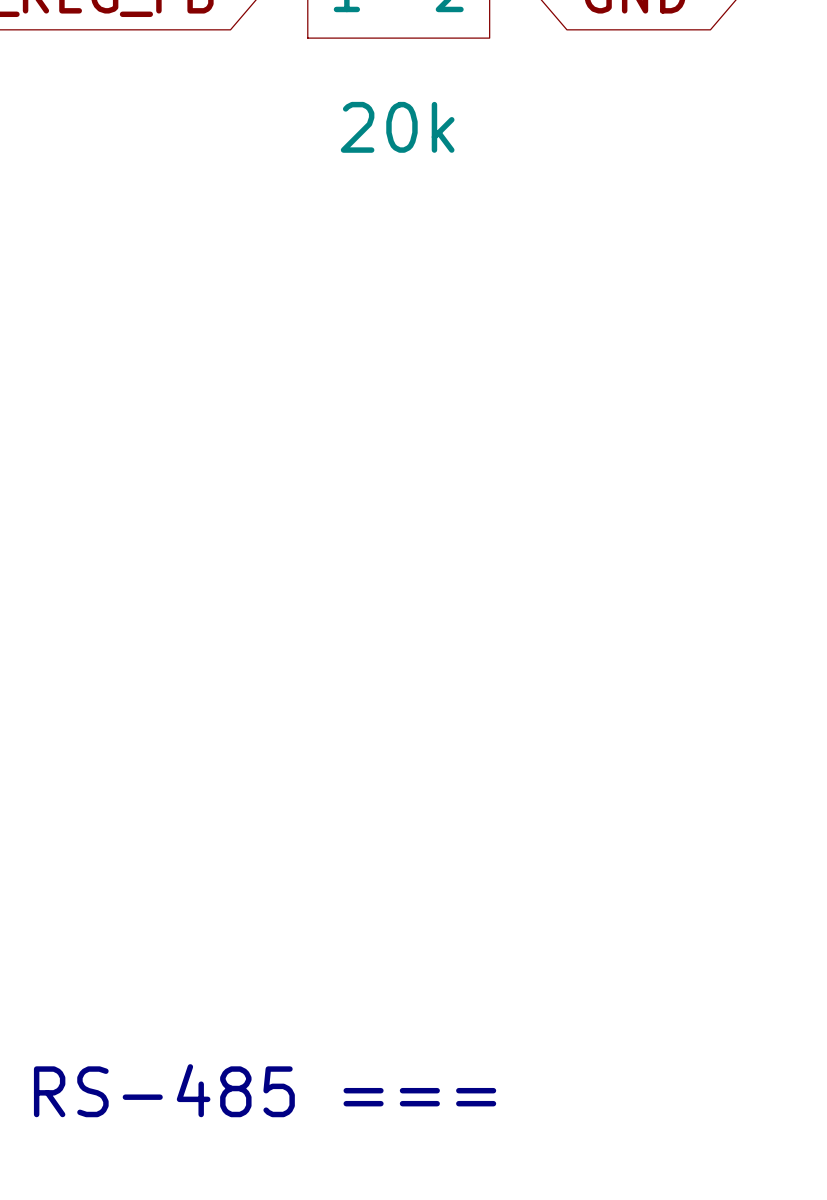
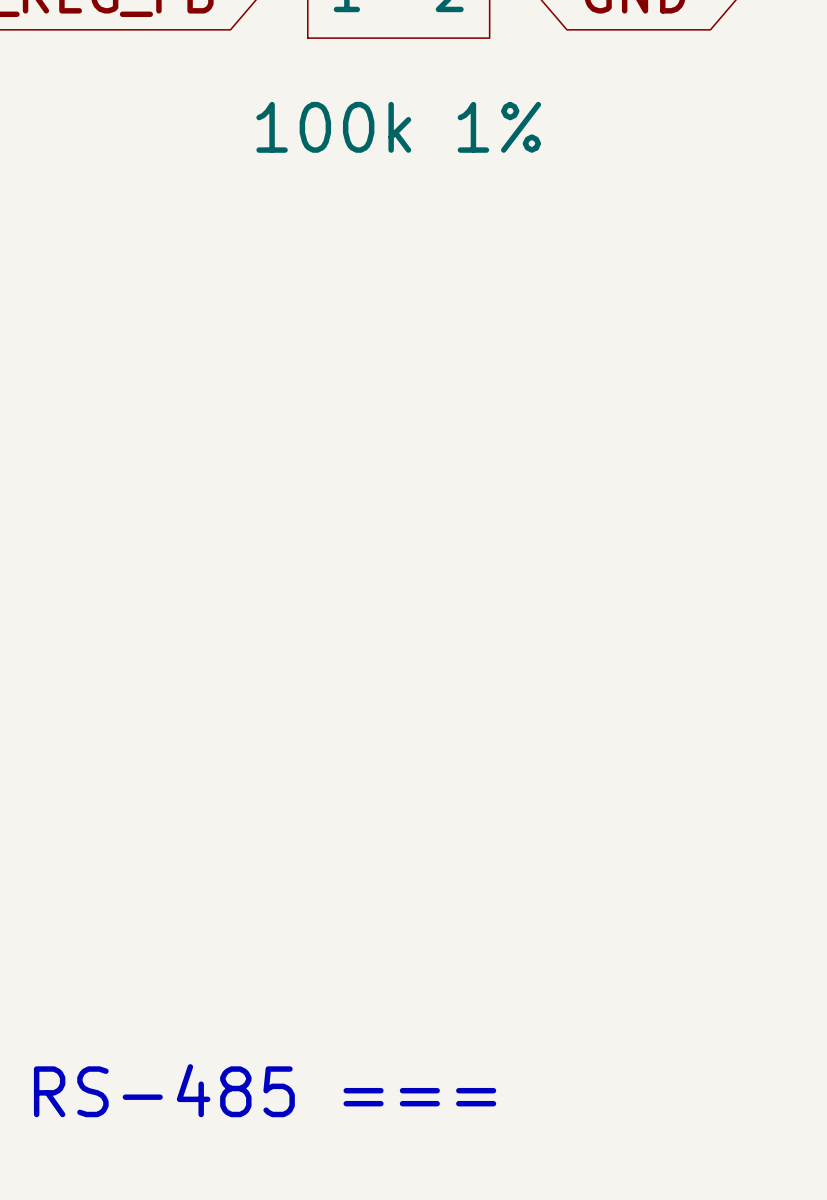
part value: 20k (397, 127) -> 100k 1% (398, 127)

